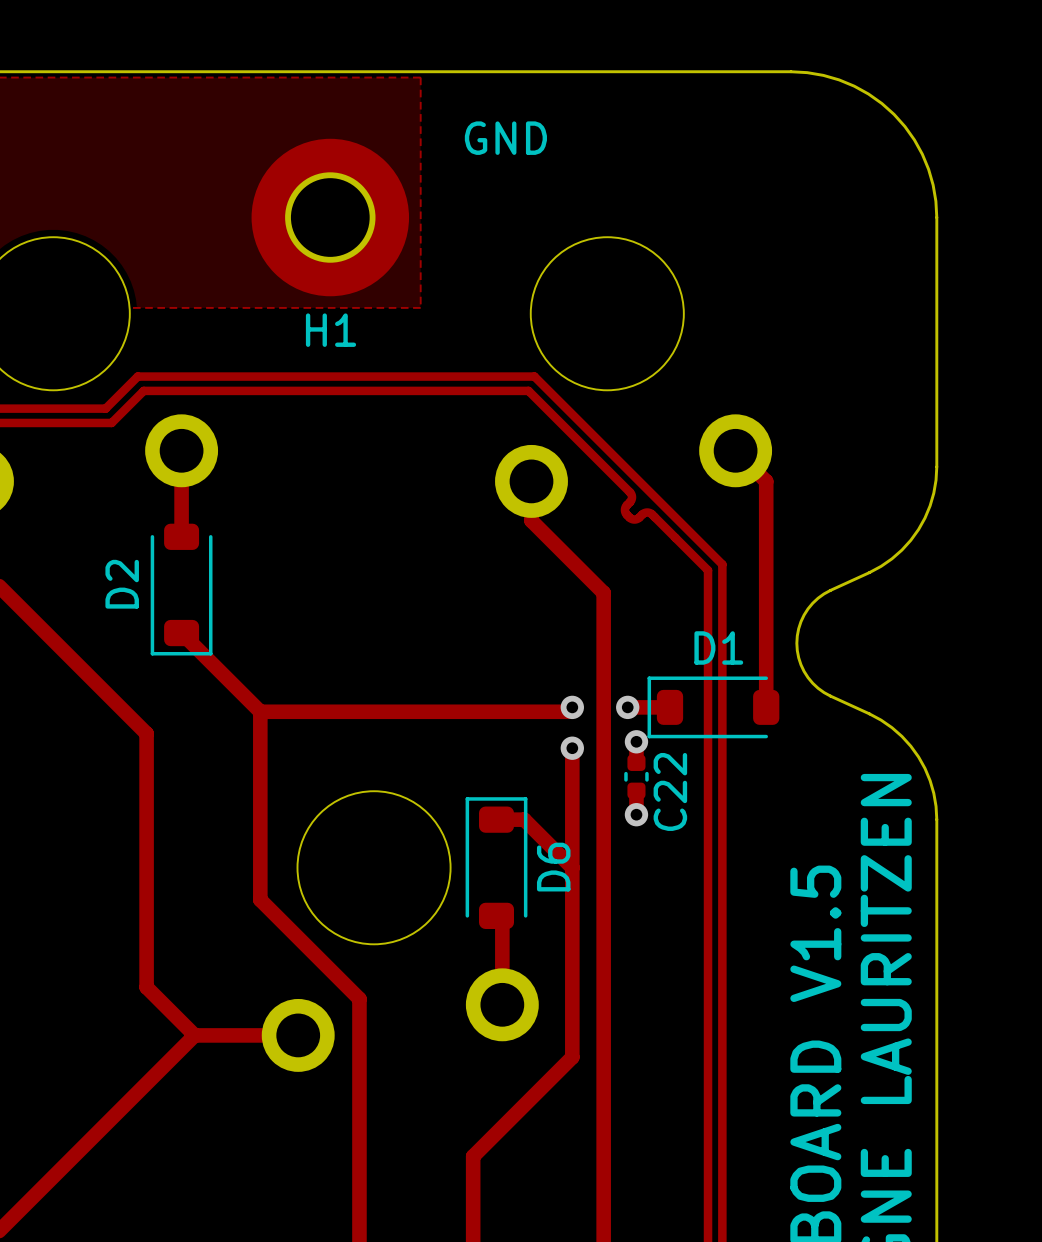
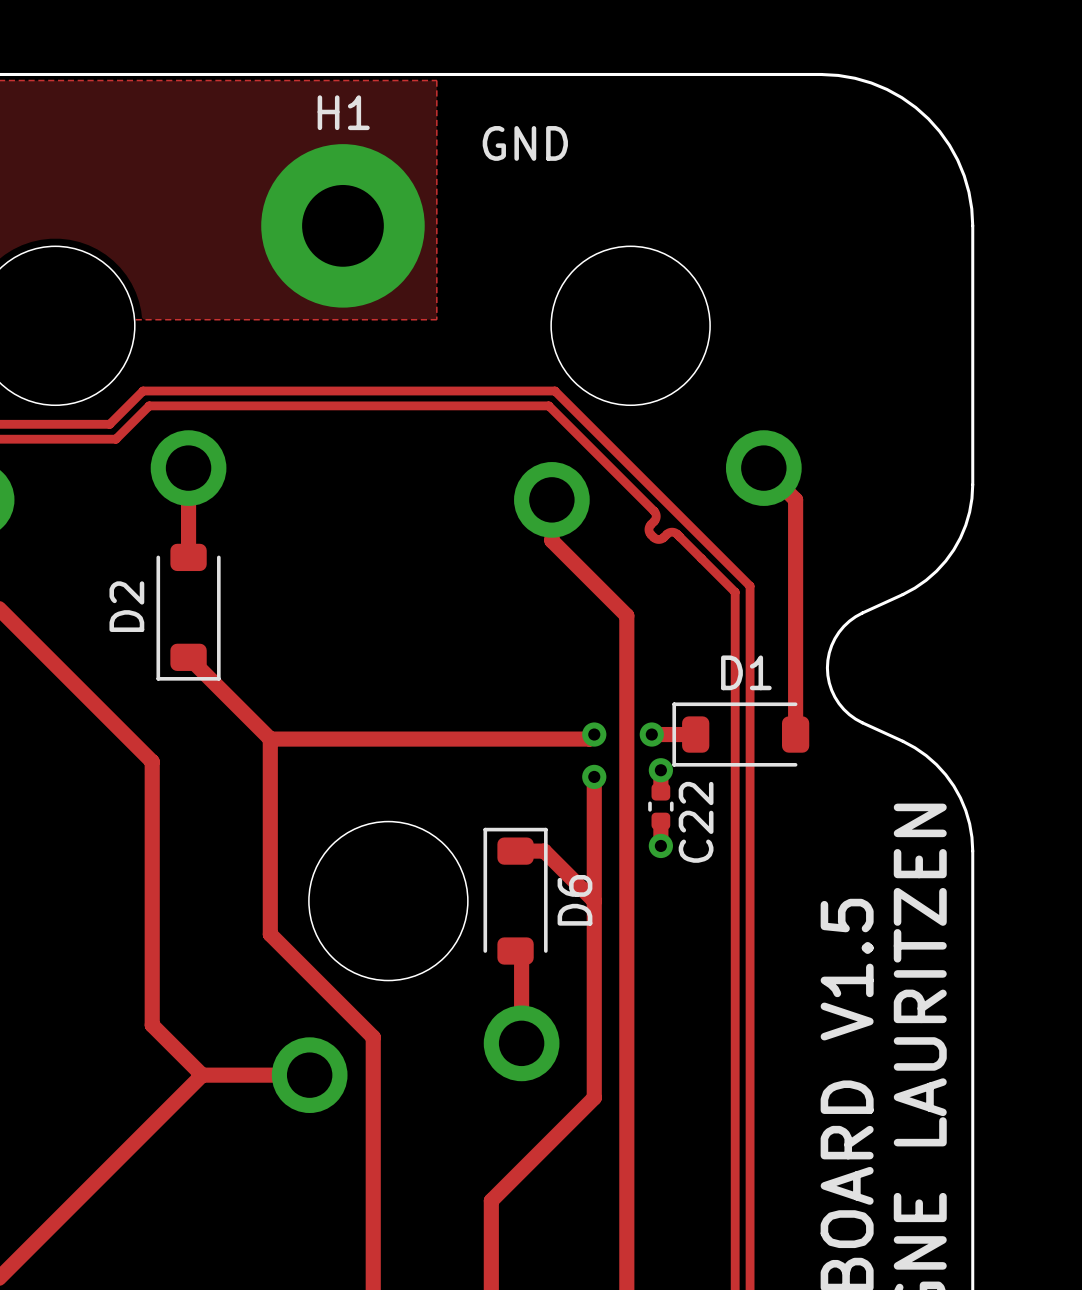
H1 footprint: [251, 138, 410, 297] -> [261, 144, 425, 308]
H1 name position: H1 (330, 330) -> H1 (343, 112)

